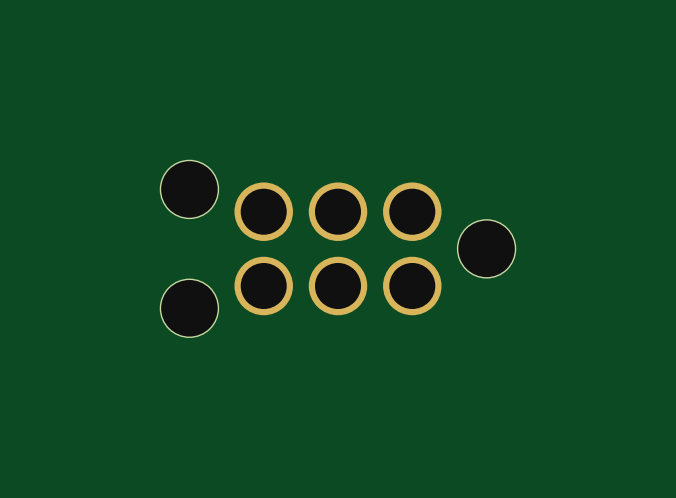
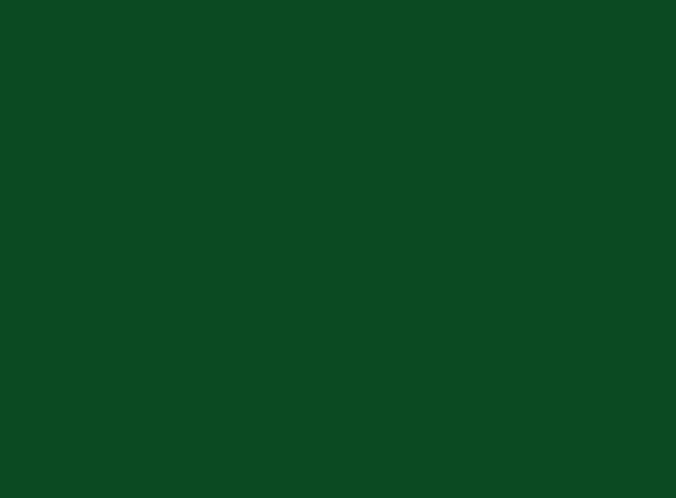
part: (338, 248) -> none

